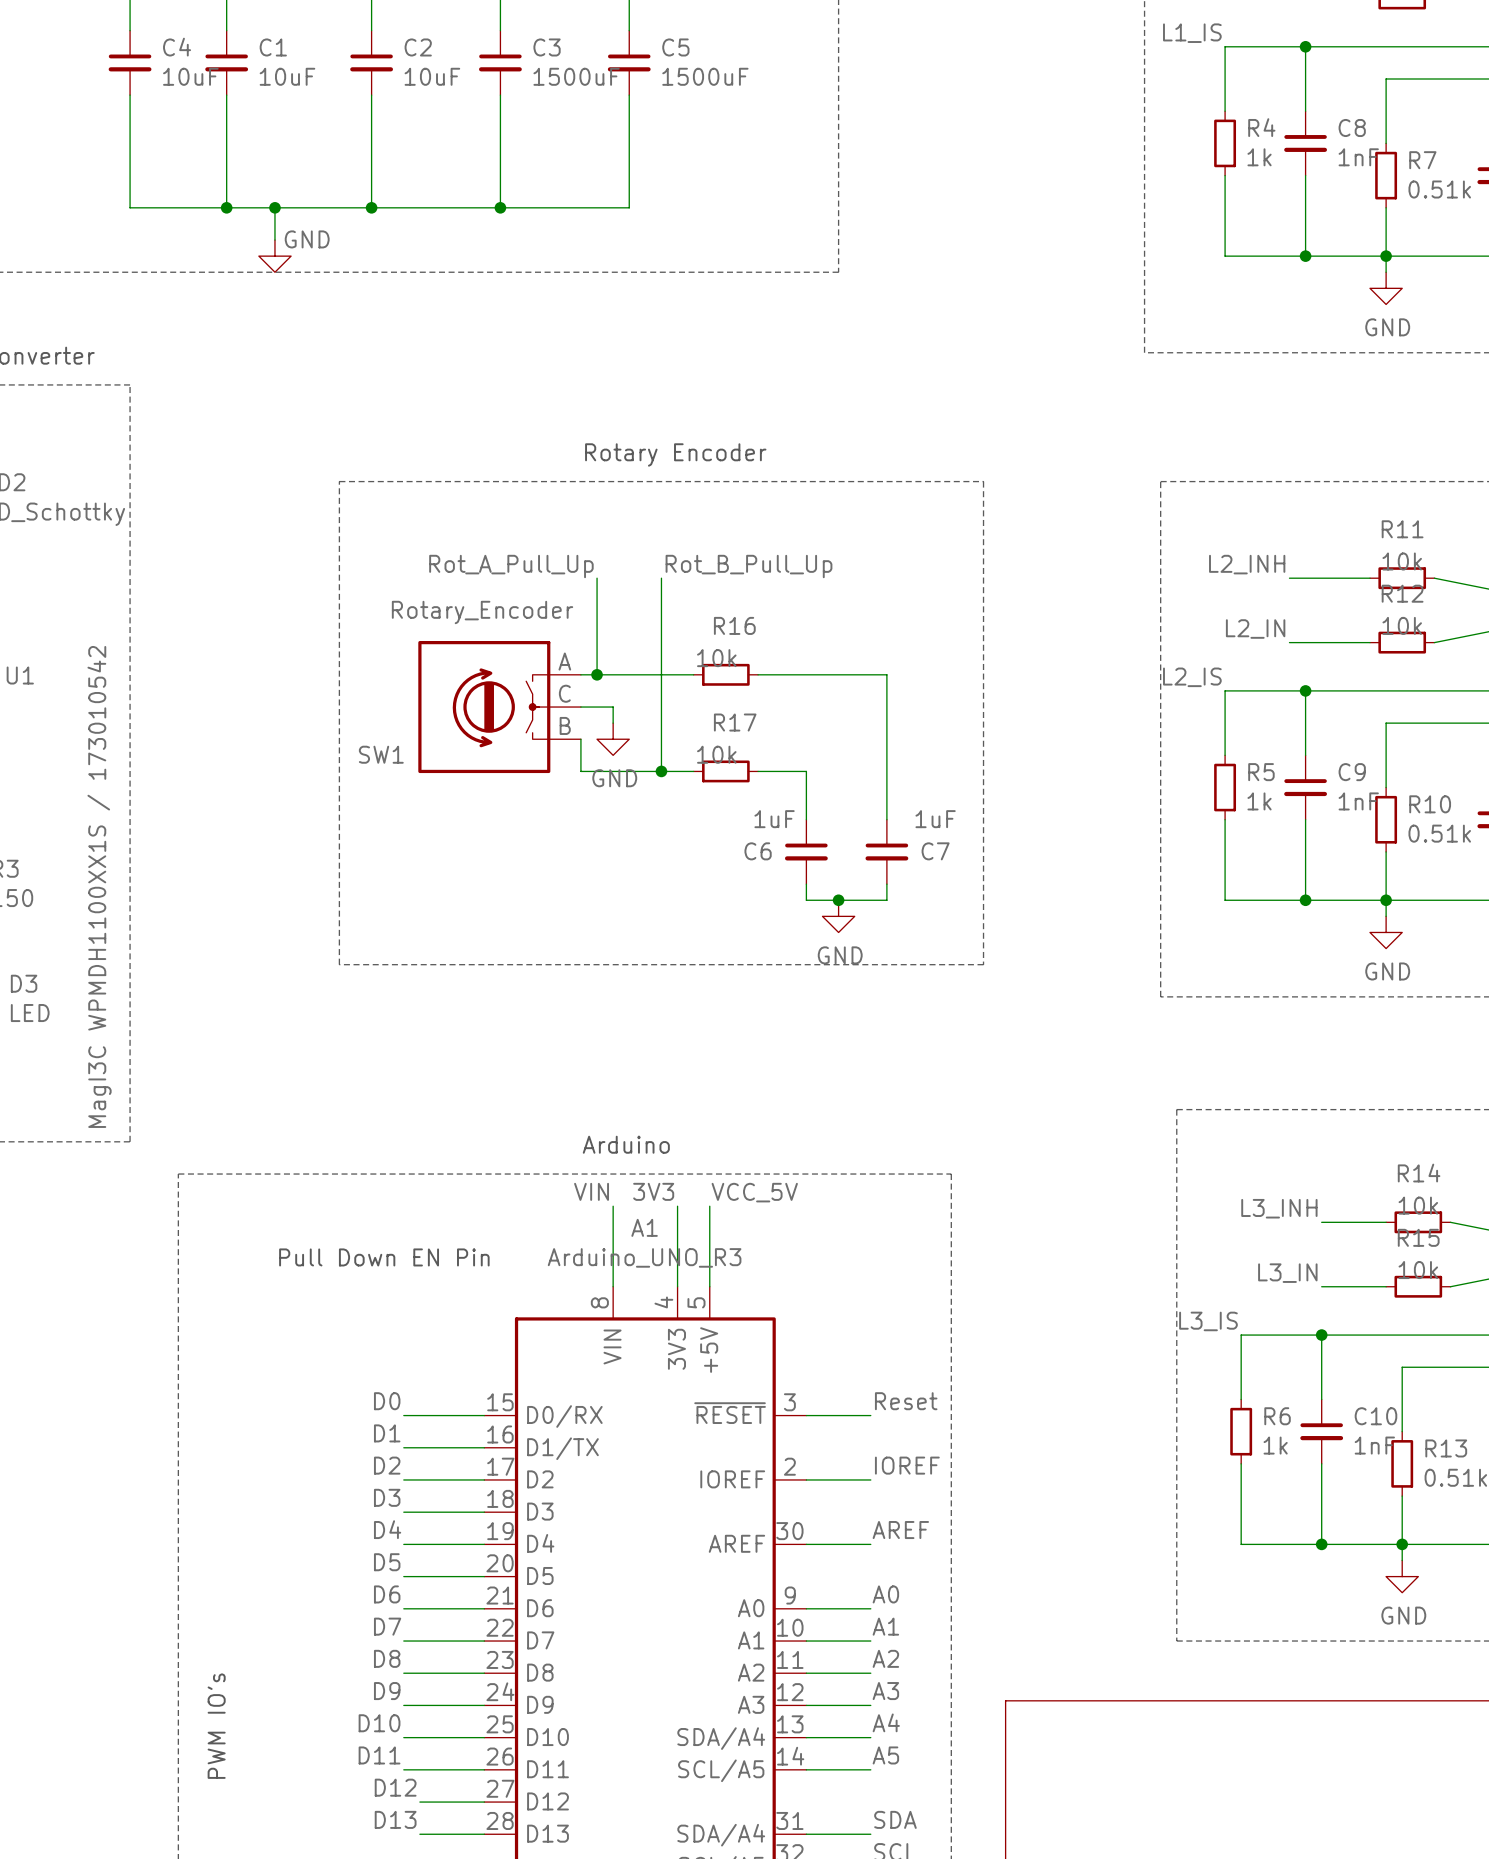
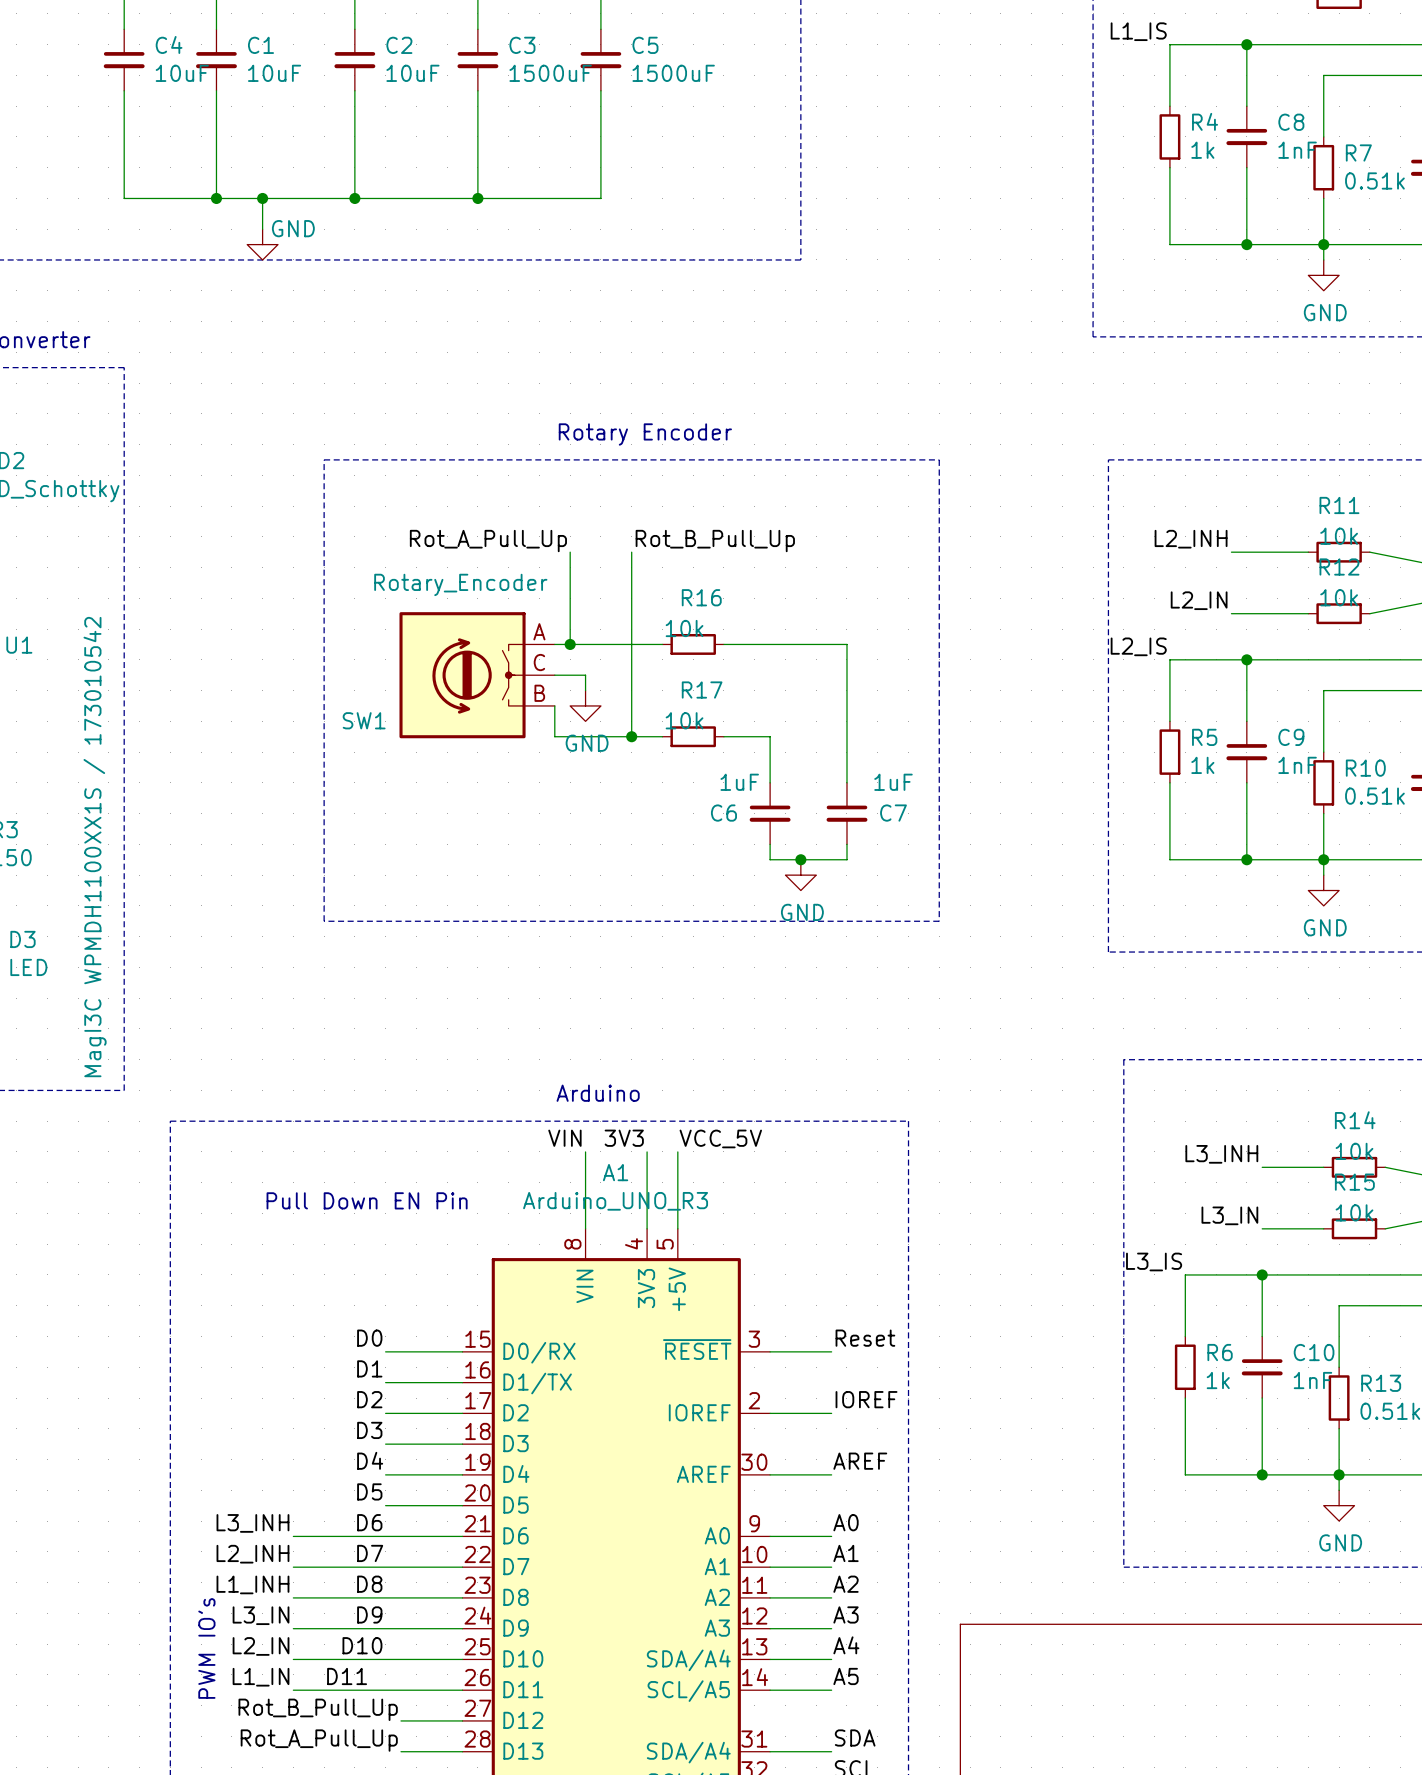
label: none -> L3_INH (252, 1523)
wire: none -> (293, 1536) (385, 1536)
label: none -> L2_INH (252, 1554)
wire: none -> (293, 1567) (385, 1567)
label: none -> L1_INH (252, 1584)
wire: none -> (293, 1597) (385, 1597)
label: none -> L3_IN (261, 1615)
wire: none -> (293, 1628) (385, 1628)
label: none -> L2_IN (261, 1646)
wire: none -> (293, 1659) (385, 1659)
label position: D11 (379, 1755) -> D11 (347, 1676)
label: none -> L1_IN (261, 1677)
wire: none -> (293, 1690) (385, 1690)
label: D12 (395, 1787) -> Rot_B_Pull_Up (318, 1709)
label: D13 (395, 1819) -> Rot_A_Pull_Up (319, 1740)

